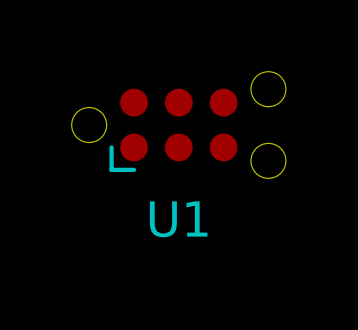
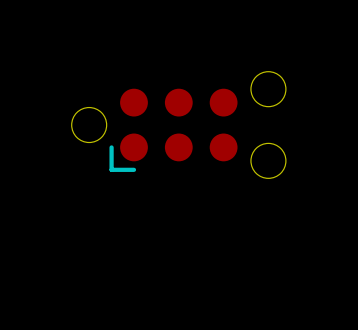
U1 name: U1 (178, 219) -> none

